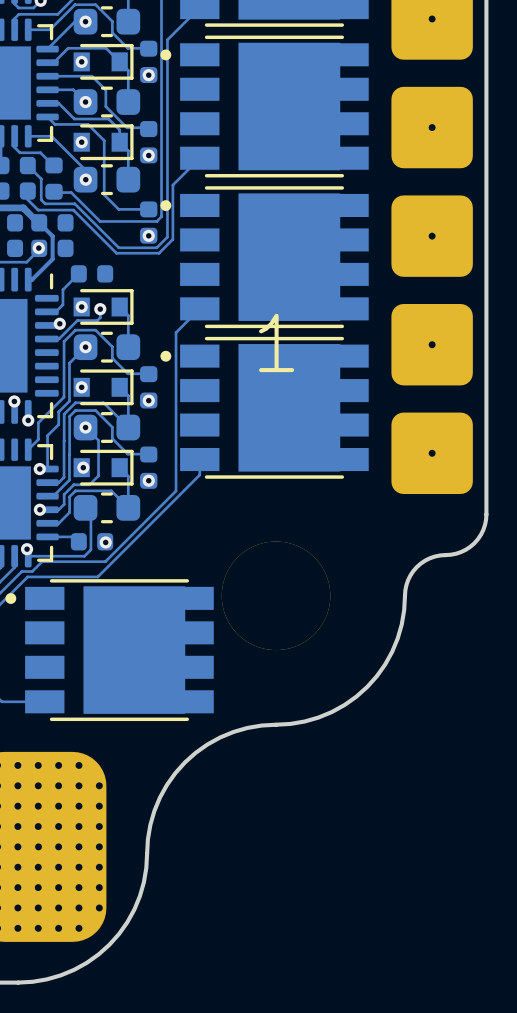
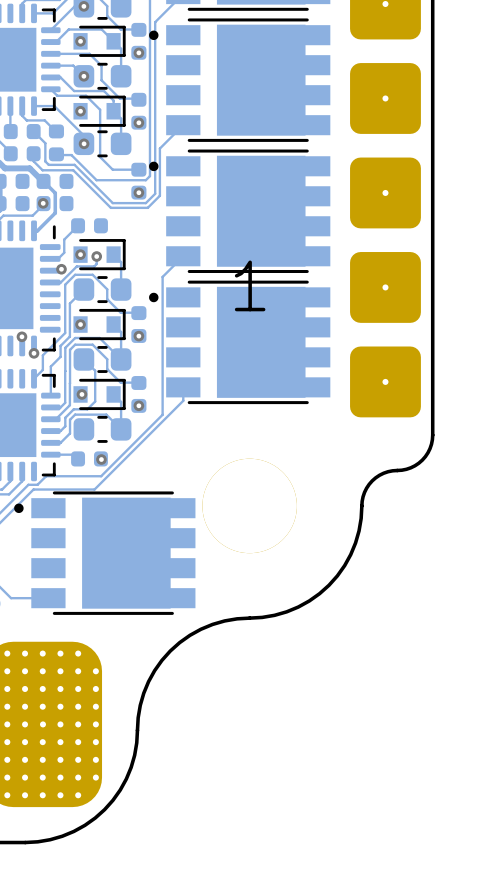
via: (85, 347) -> none
via: (85, 427) -> none
via: (39, 469) -> none
track: (85, 507) (90, 513) (90, 549) (84, 556) (28, 556) -> none
via: (39, 509) -> none
via: (27, 549) -> none

